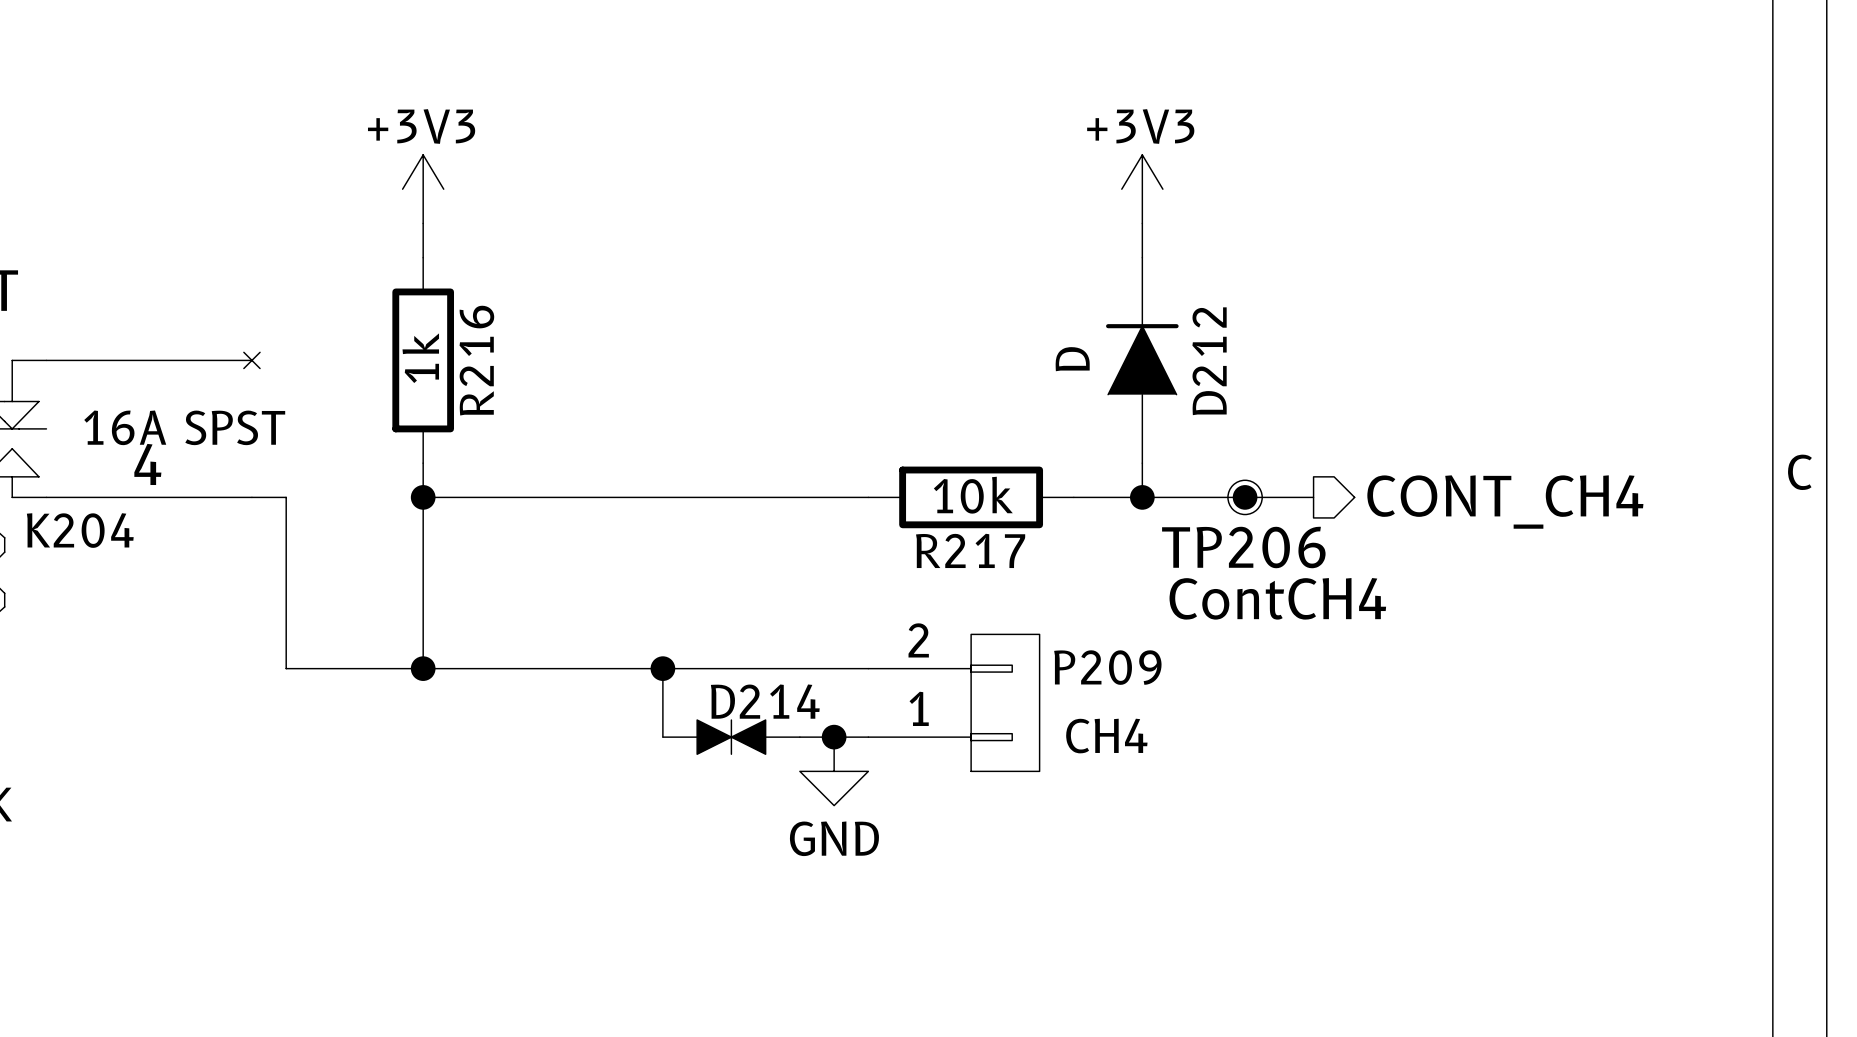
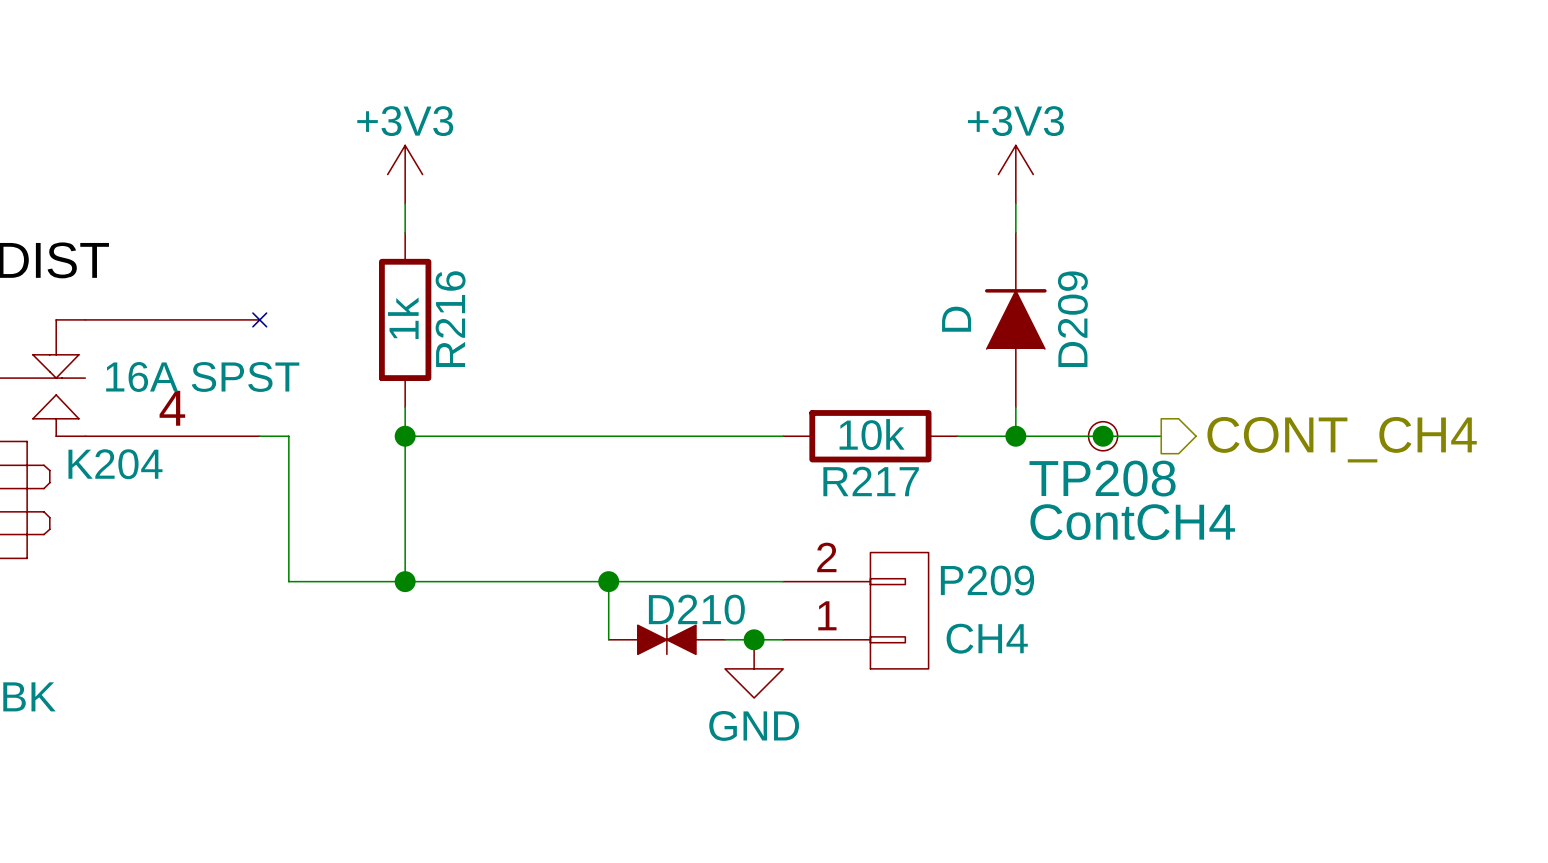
D212 name: D212 (1209, 361) -> D209 (1072, 319)
TP206 name: TP206 (1243, 547) -> TP208 (1102, 478)
D214 name: D214 (765, 701) -> D210 (696, 609)

